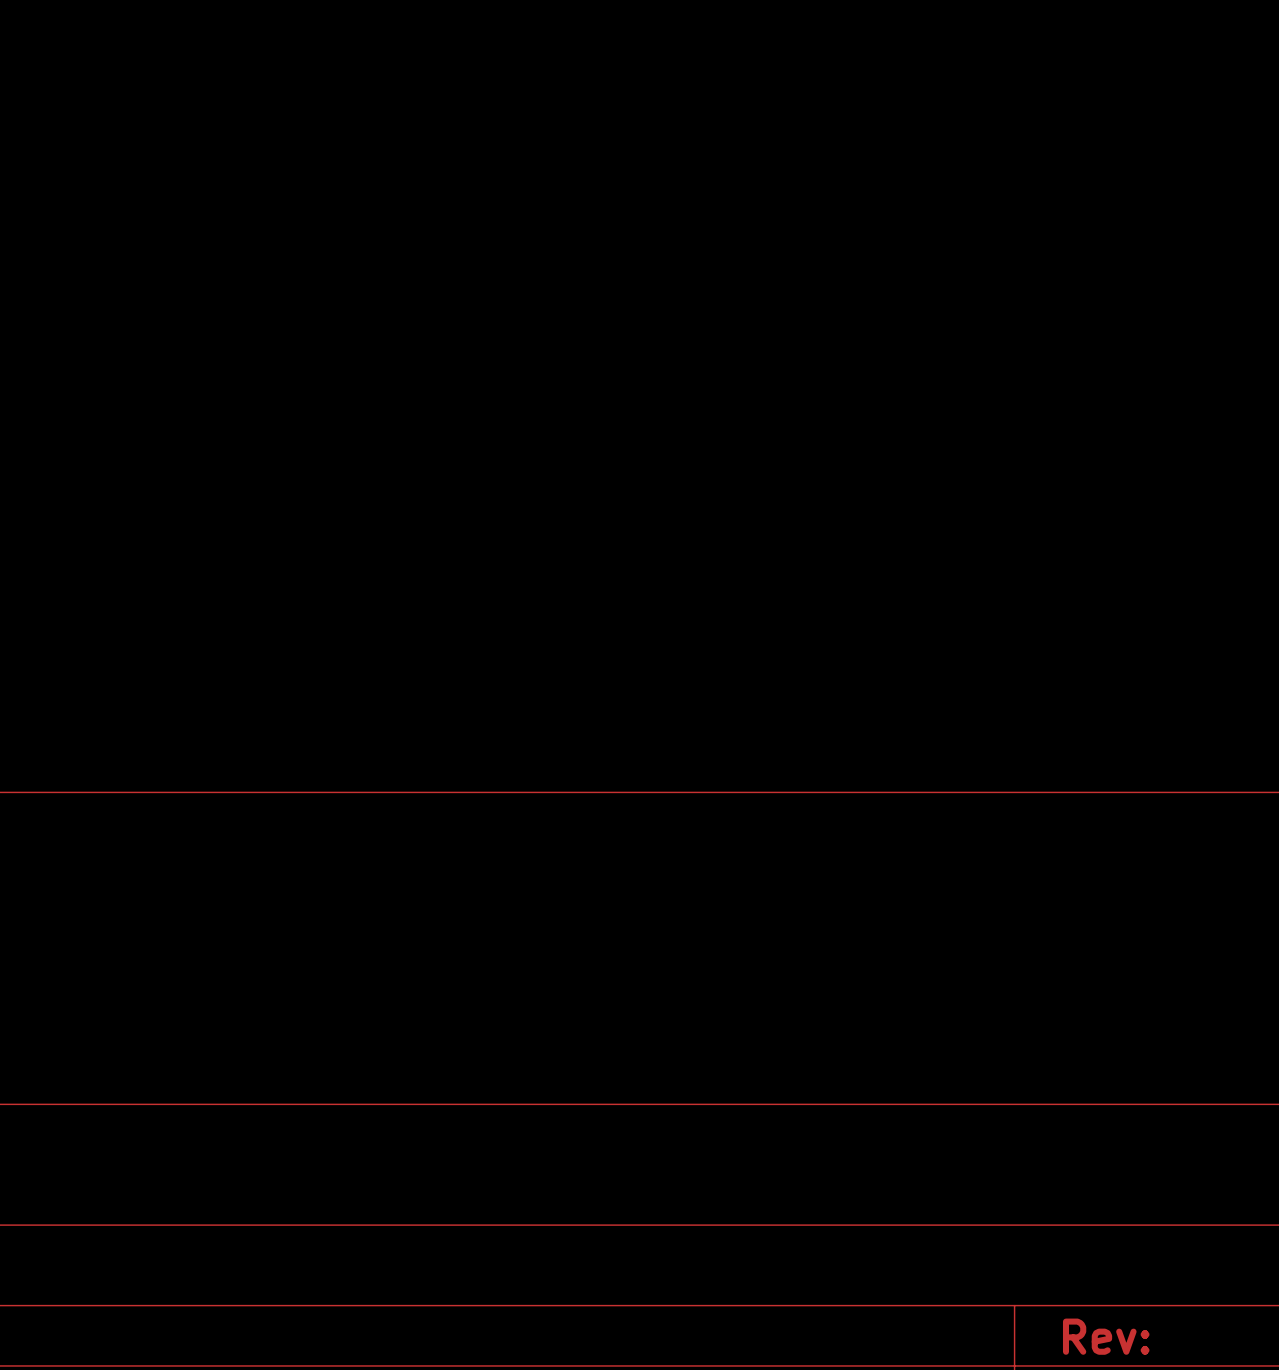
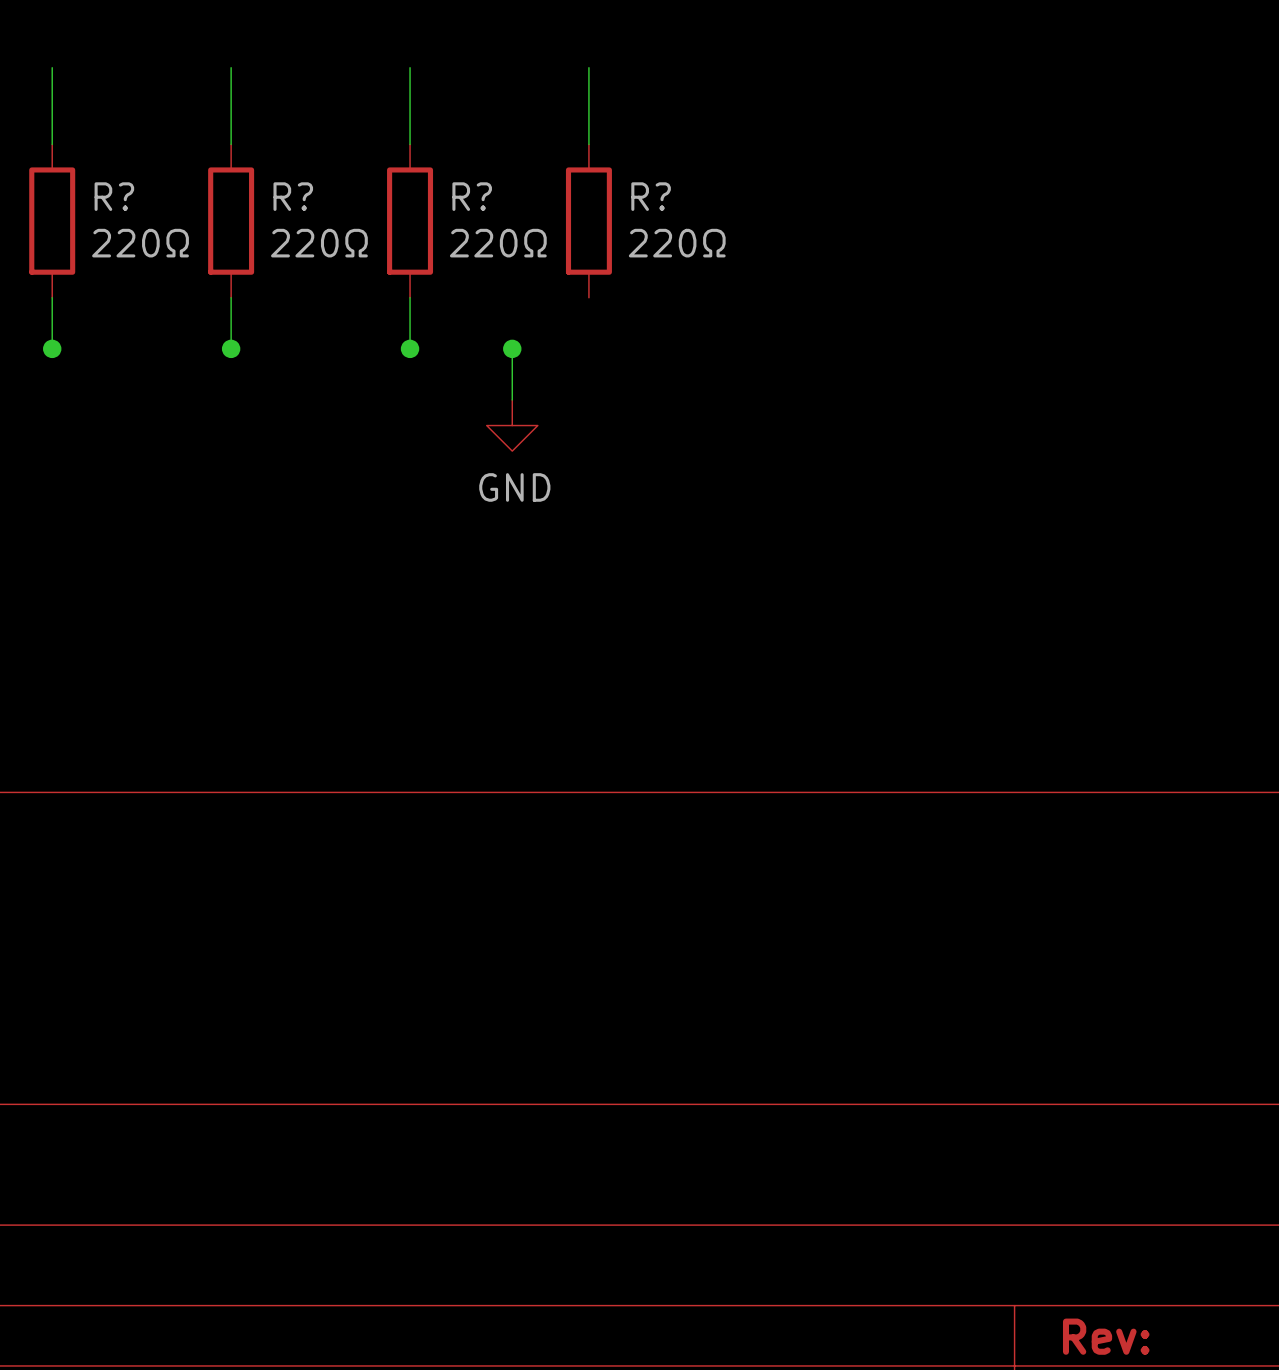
wire: none -> (52, 67) (52, 144)
wire: none -> (231, 67) (231, 144)
wire: none -> (410, 67) (410, 144)
wire: none -> (588, 67) (588, 144)
R?: none -> 220Ω (52, 221)
R?: none -> 220Ω (231, 221)
R?: none -> 220Ω (410, 221)
R?: none -> 220Ω (588, 221)
wire: none -> (52, 297) (52, 348)
wire: none -> (231, 297) (231, 348)
wire: none -> (410, 297) (410, 348)
junction: none -> (52, 348)
junction: none -> (231, 348)
junction: none -> (410, 348)
wire: none -> (512, 348) (512, 399)
junction: none -> (512, 348)
power symbol: none -> GND (512, 425)

